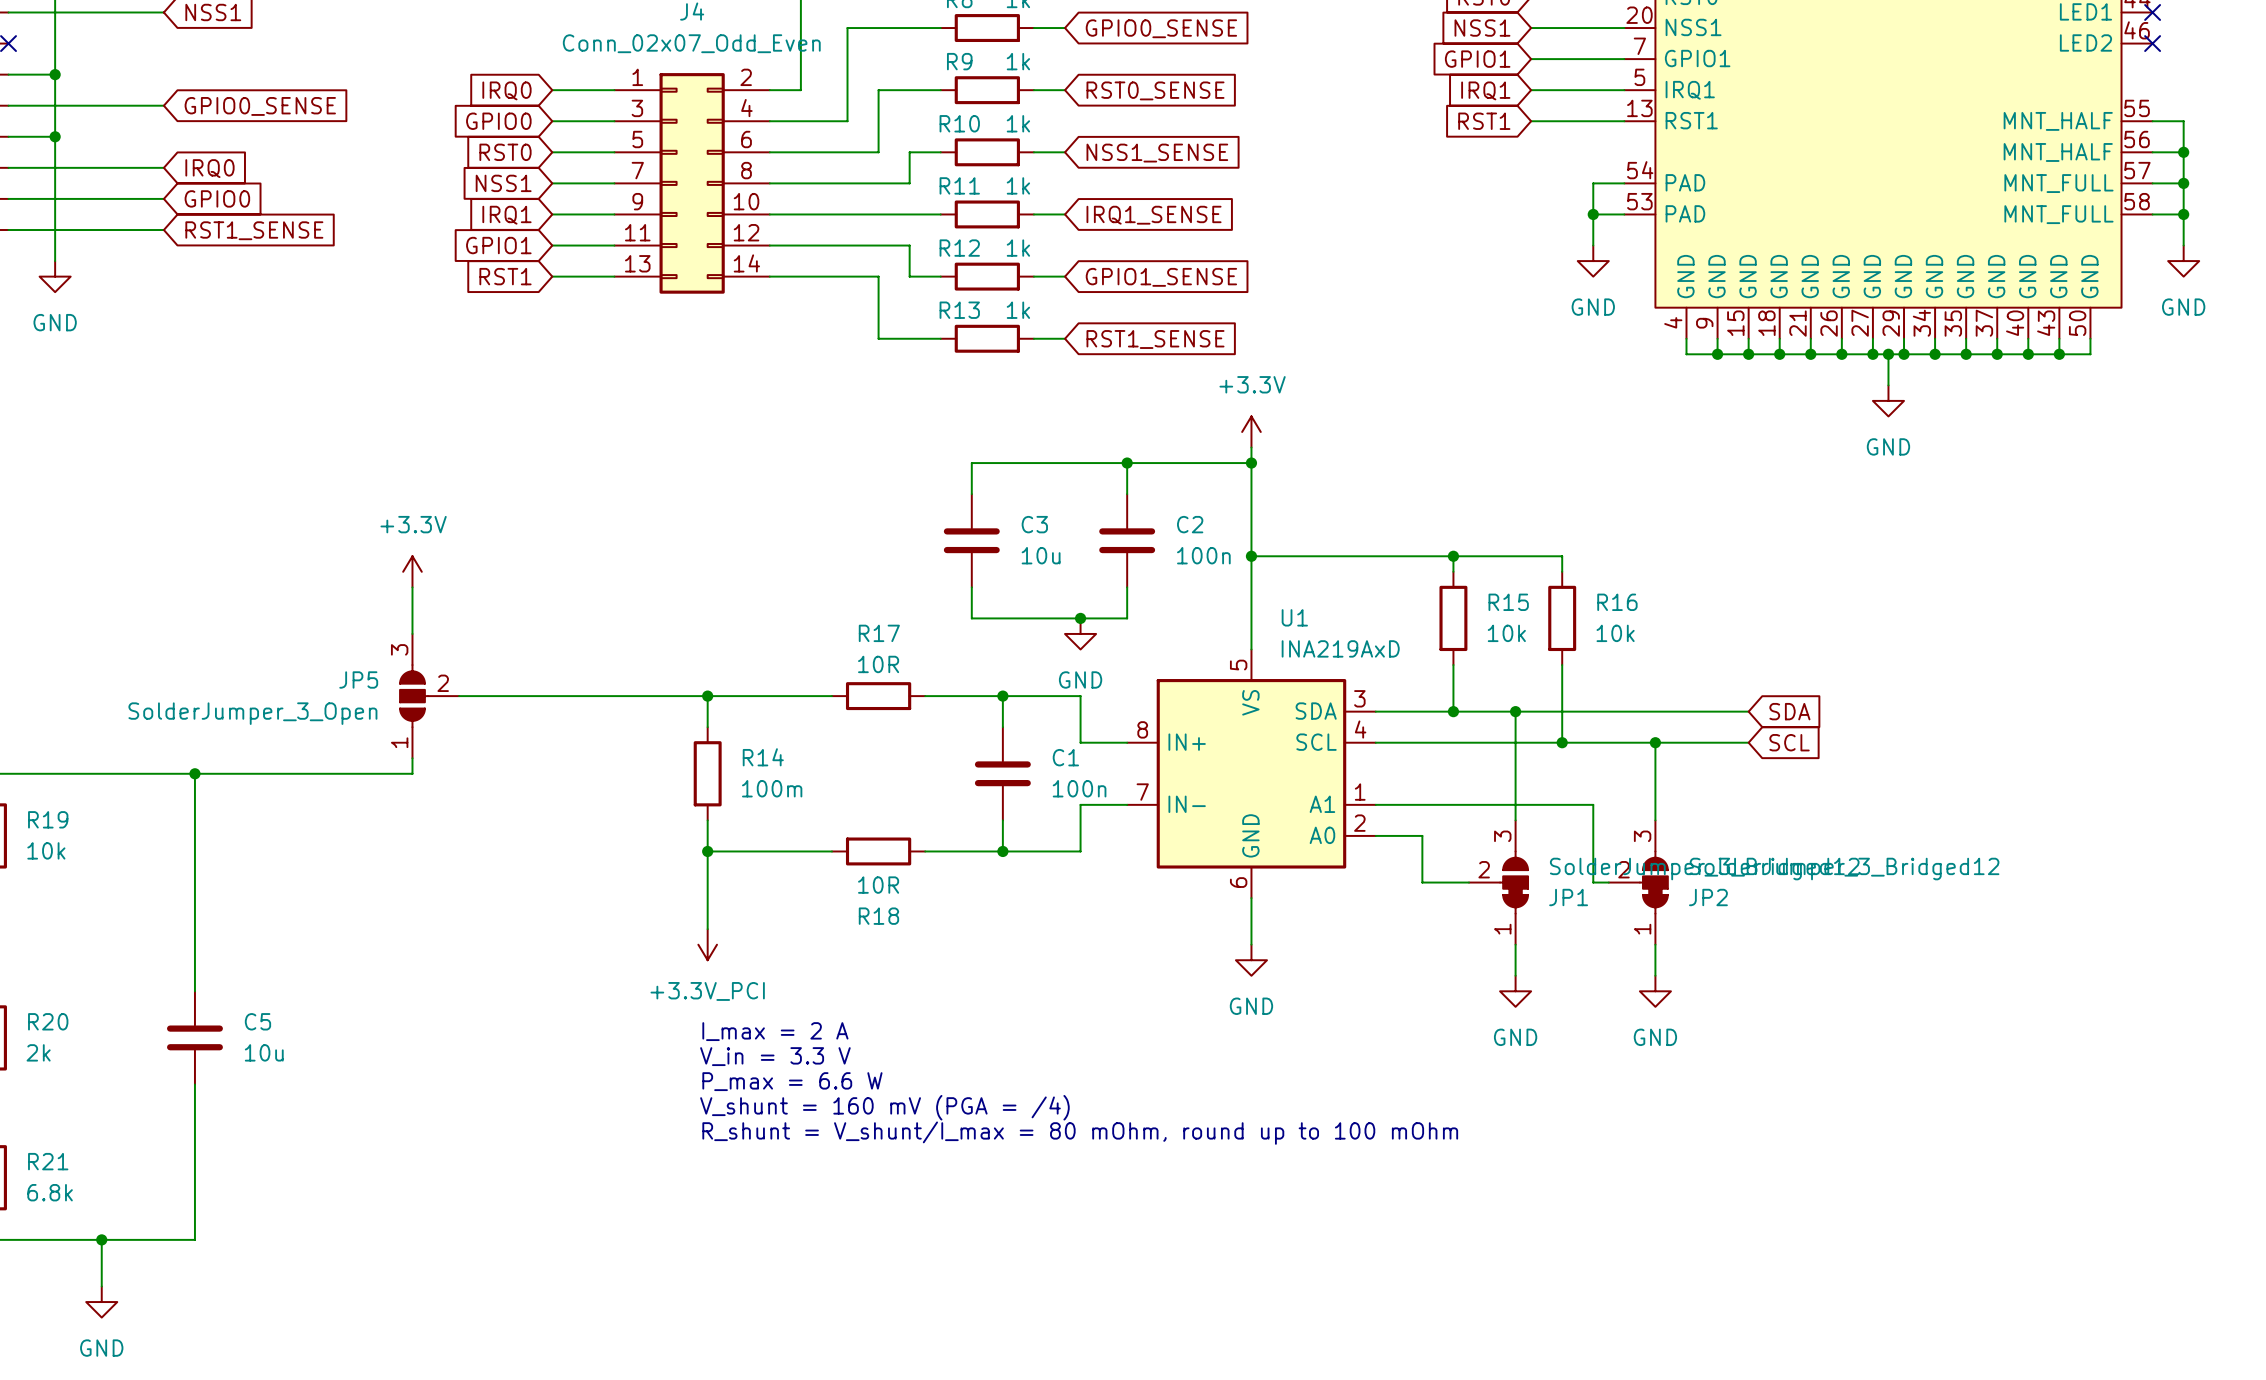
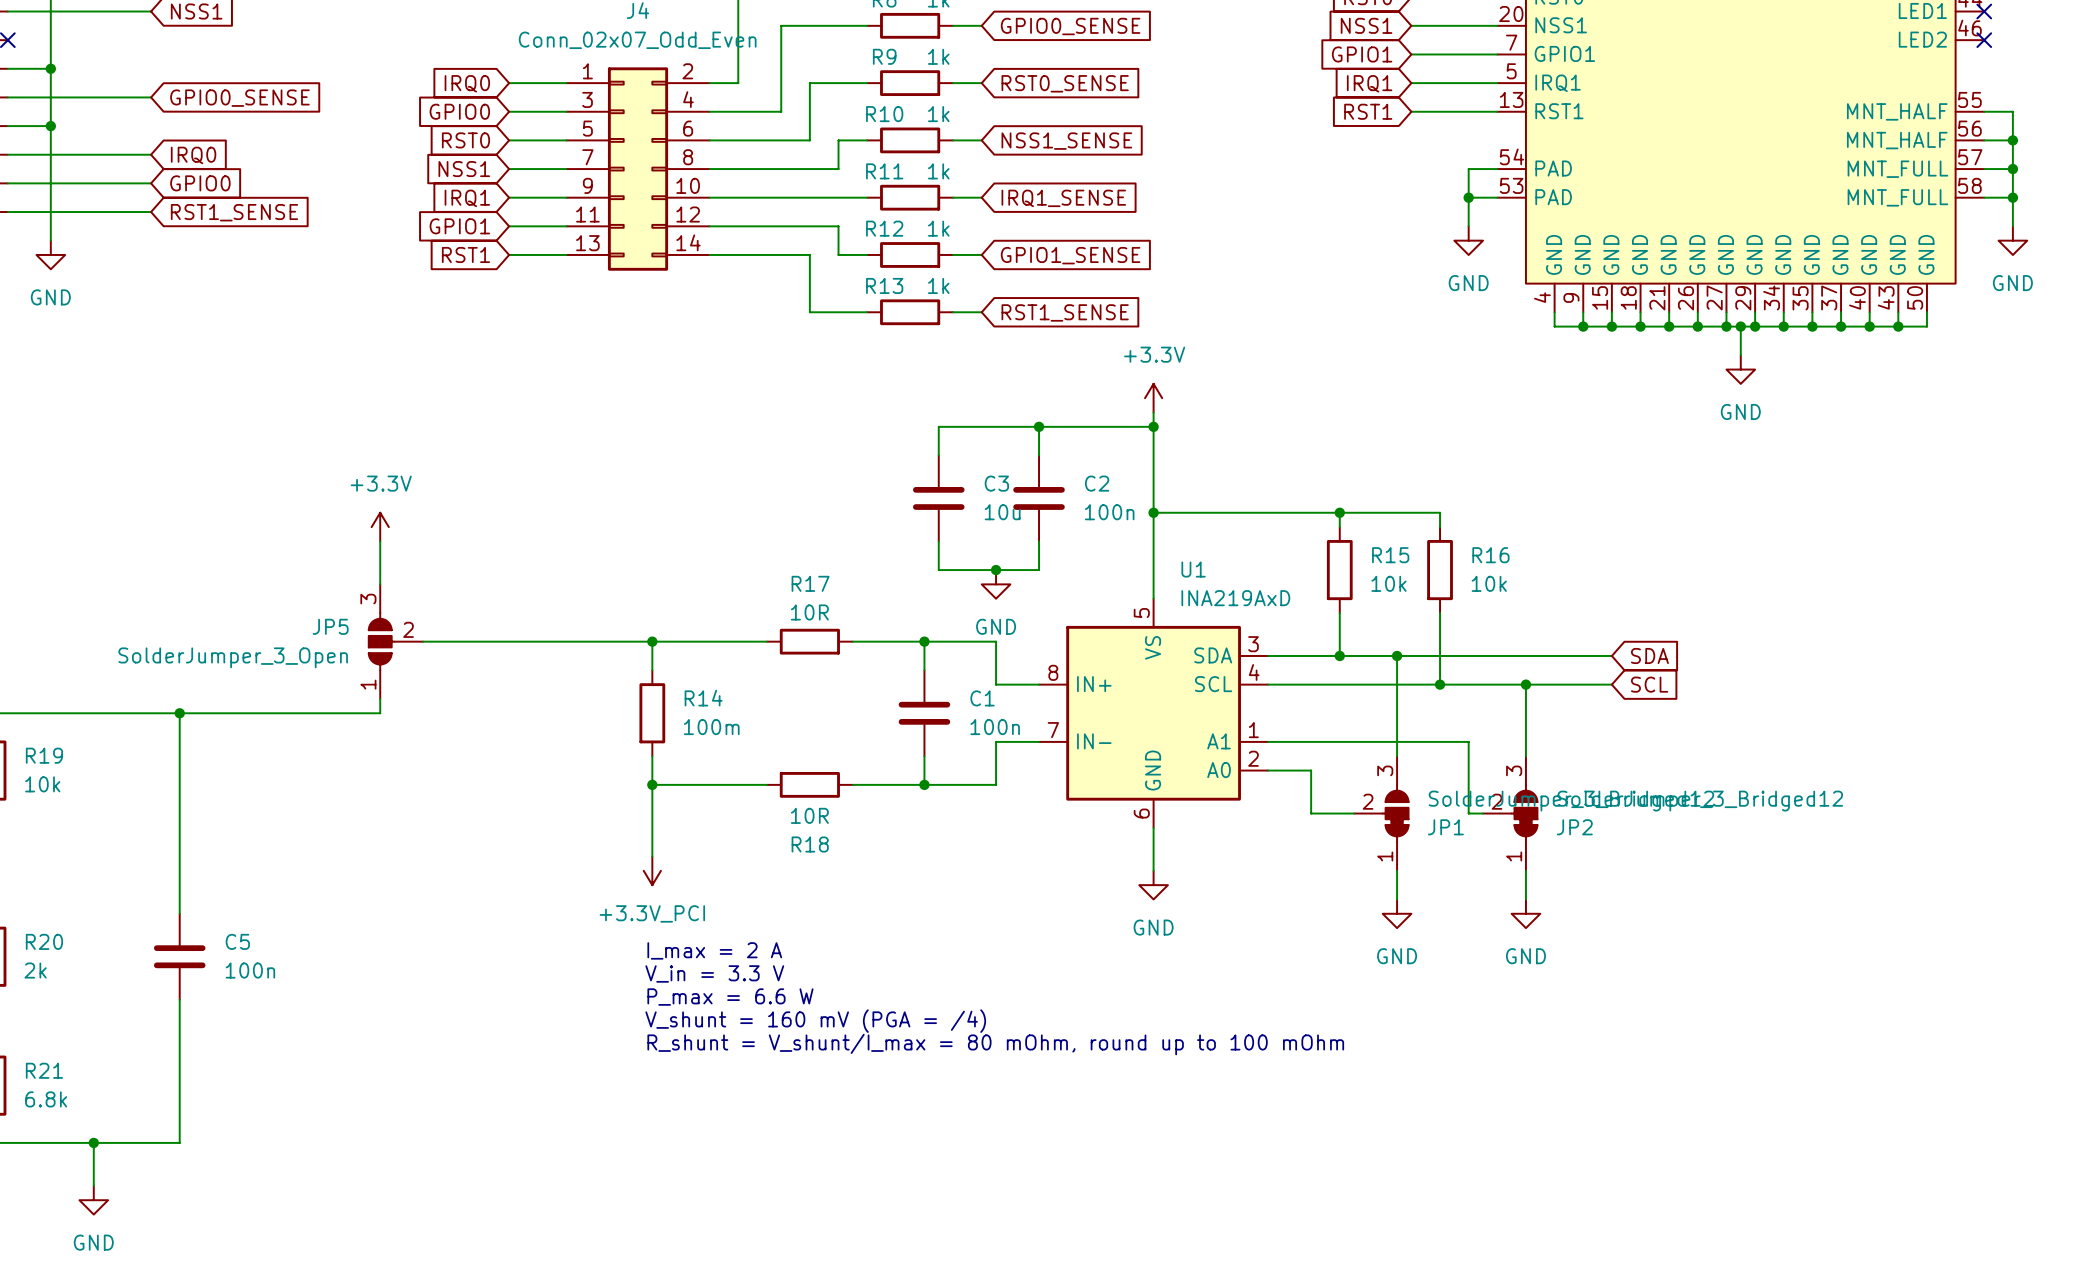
wire: (1018, 463) (971, 463) (971, 494) -> (938, 426) (938, 455)
C3 position: (971, 540) -> (938, 498)
wire: (971, 587) (971, 618) (1018, 618) -> (938, 541) (938, 570)
C5 value: 10u (264, 1052) -> 100n (250, 970)

